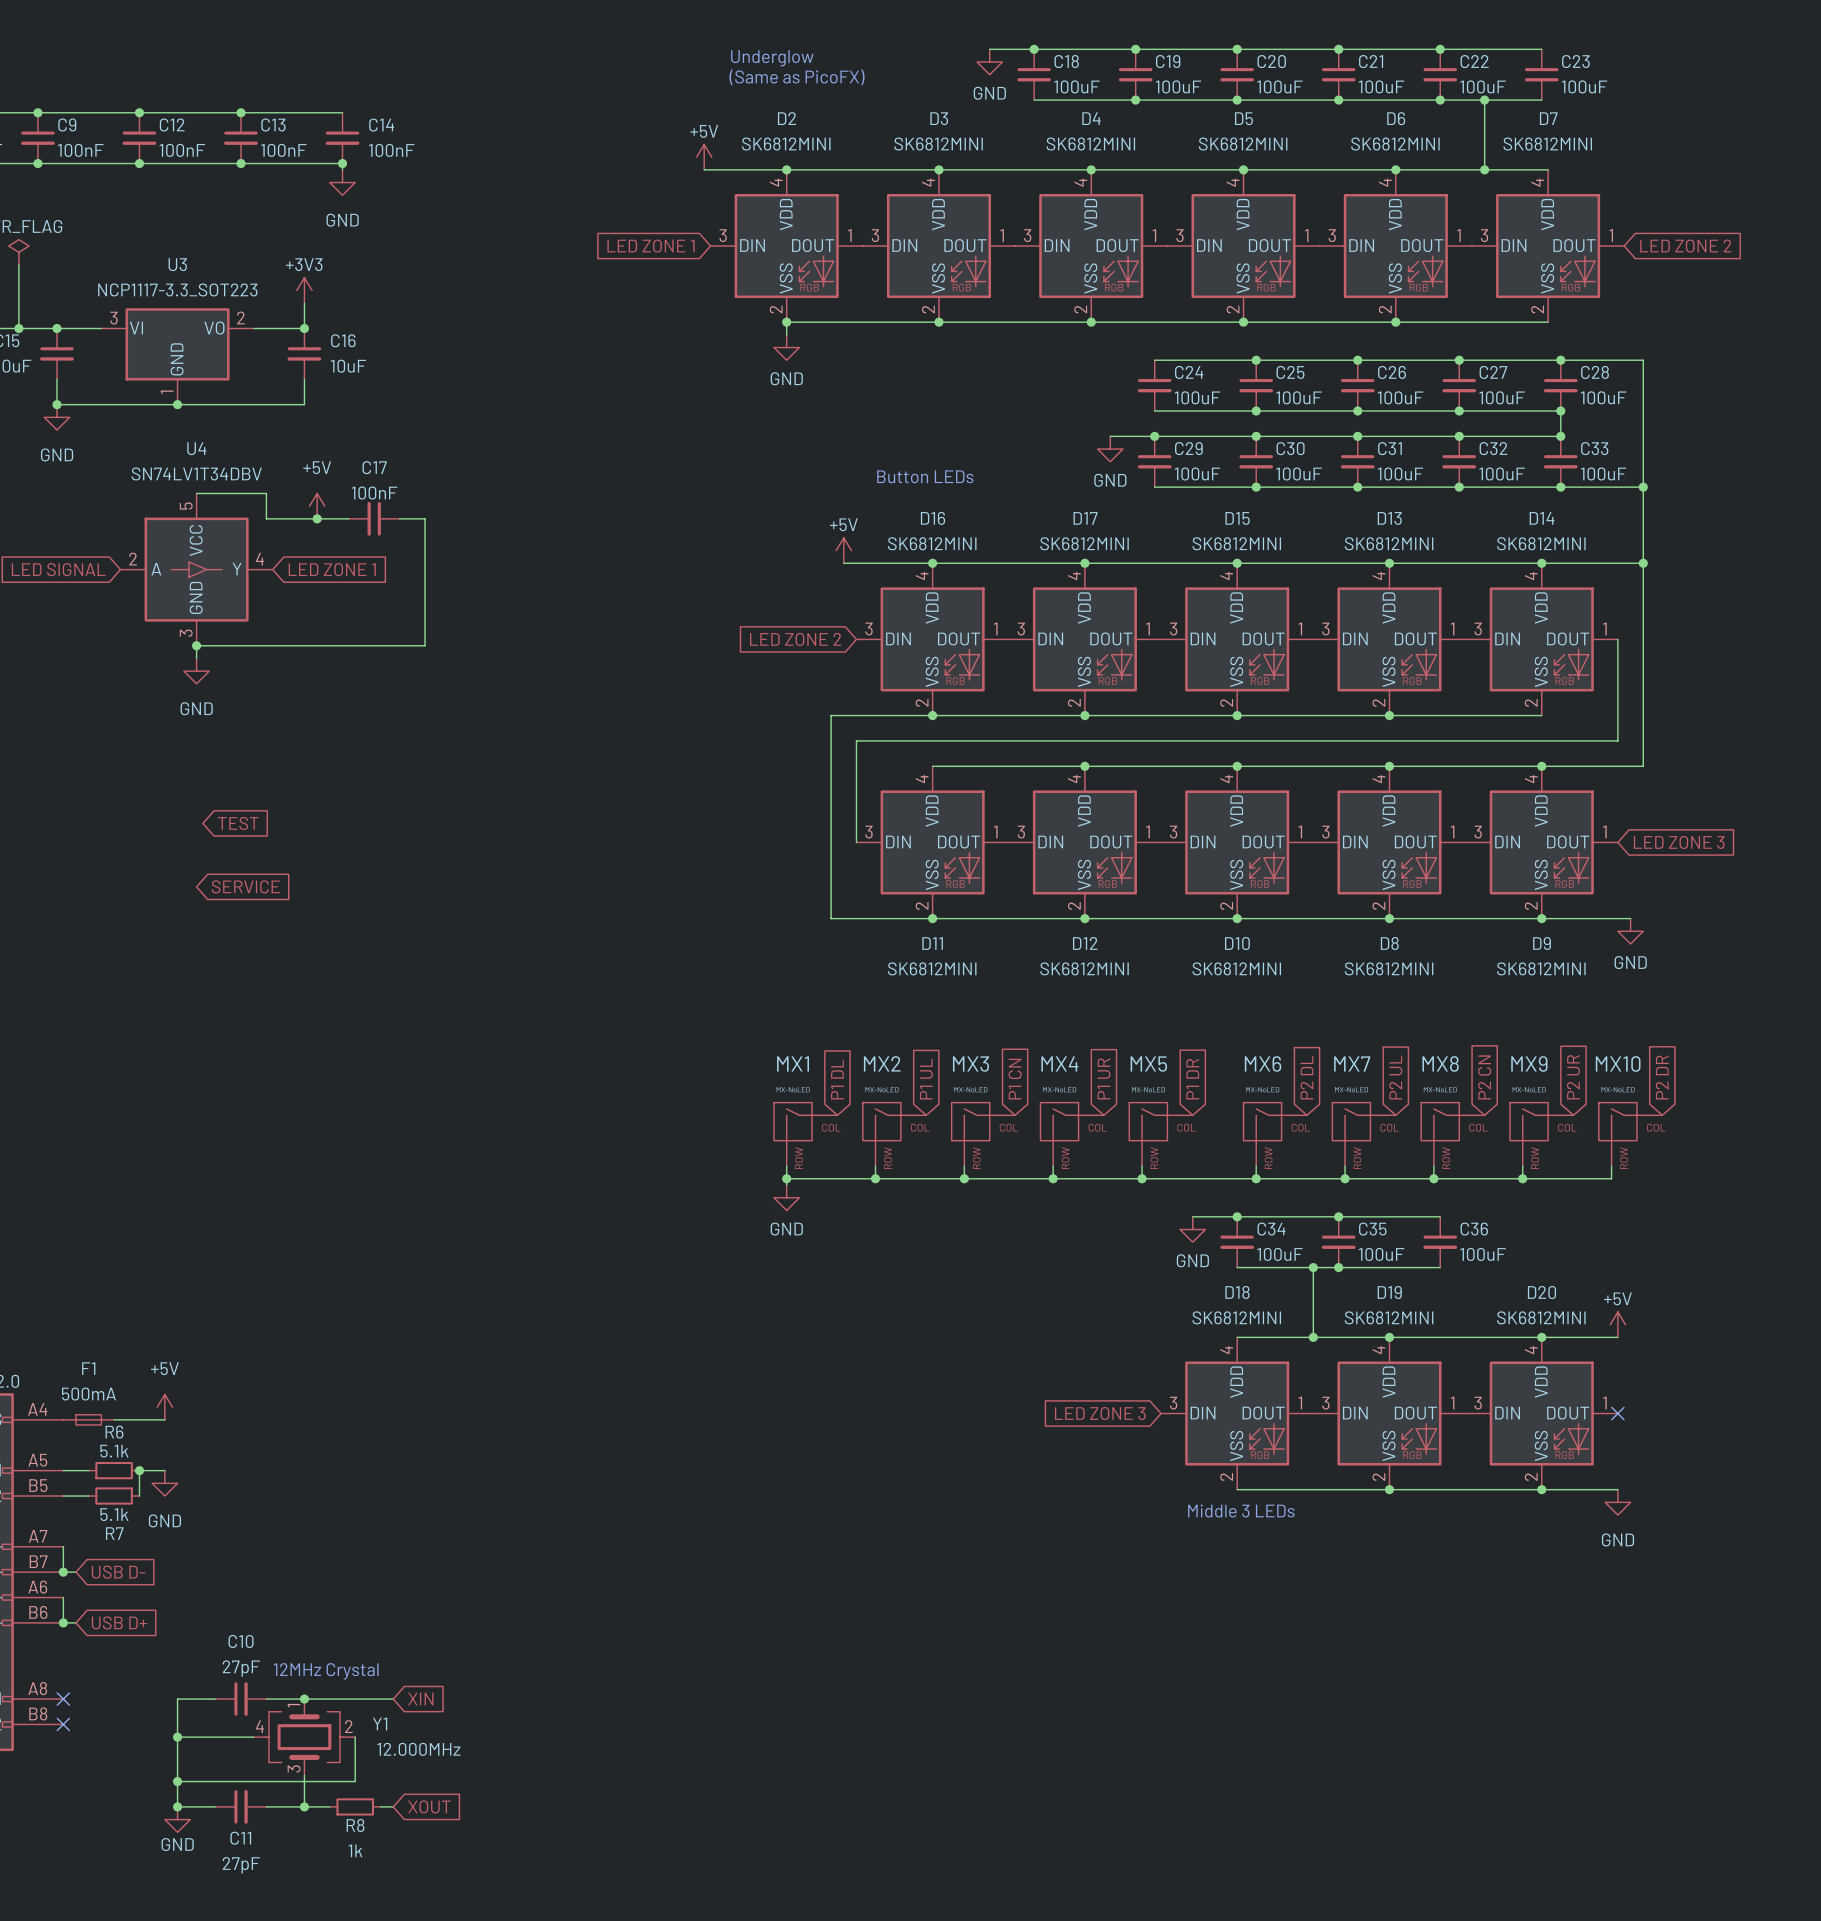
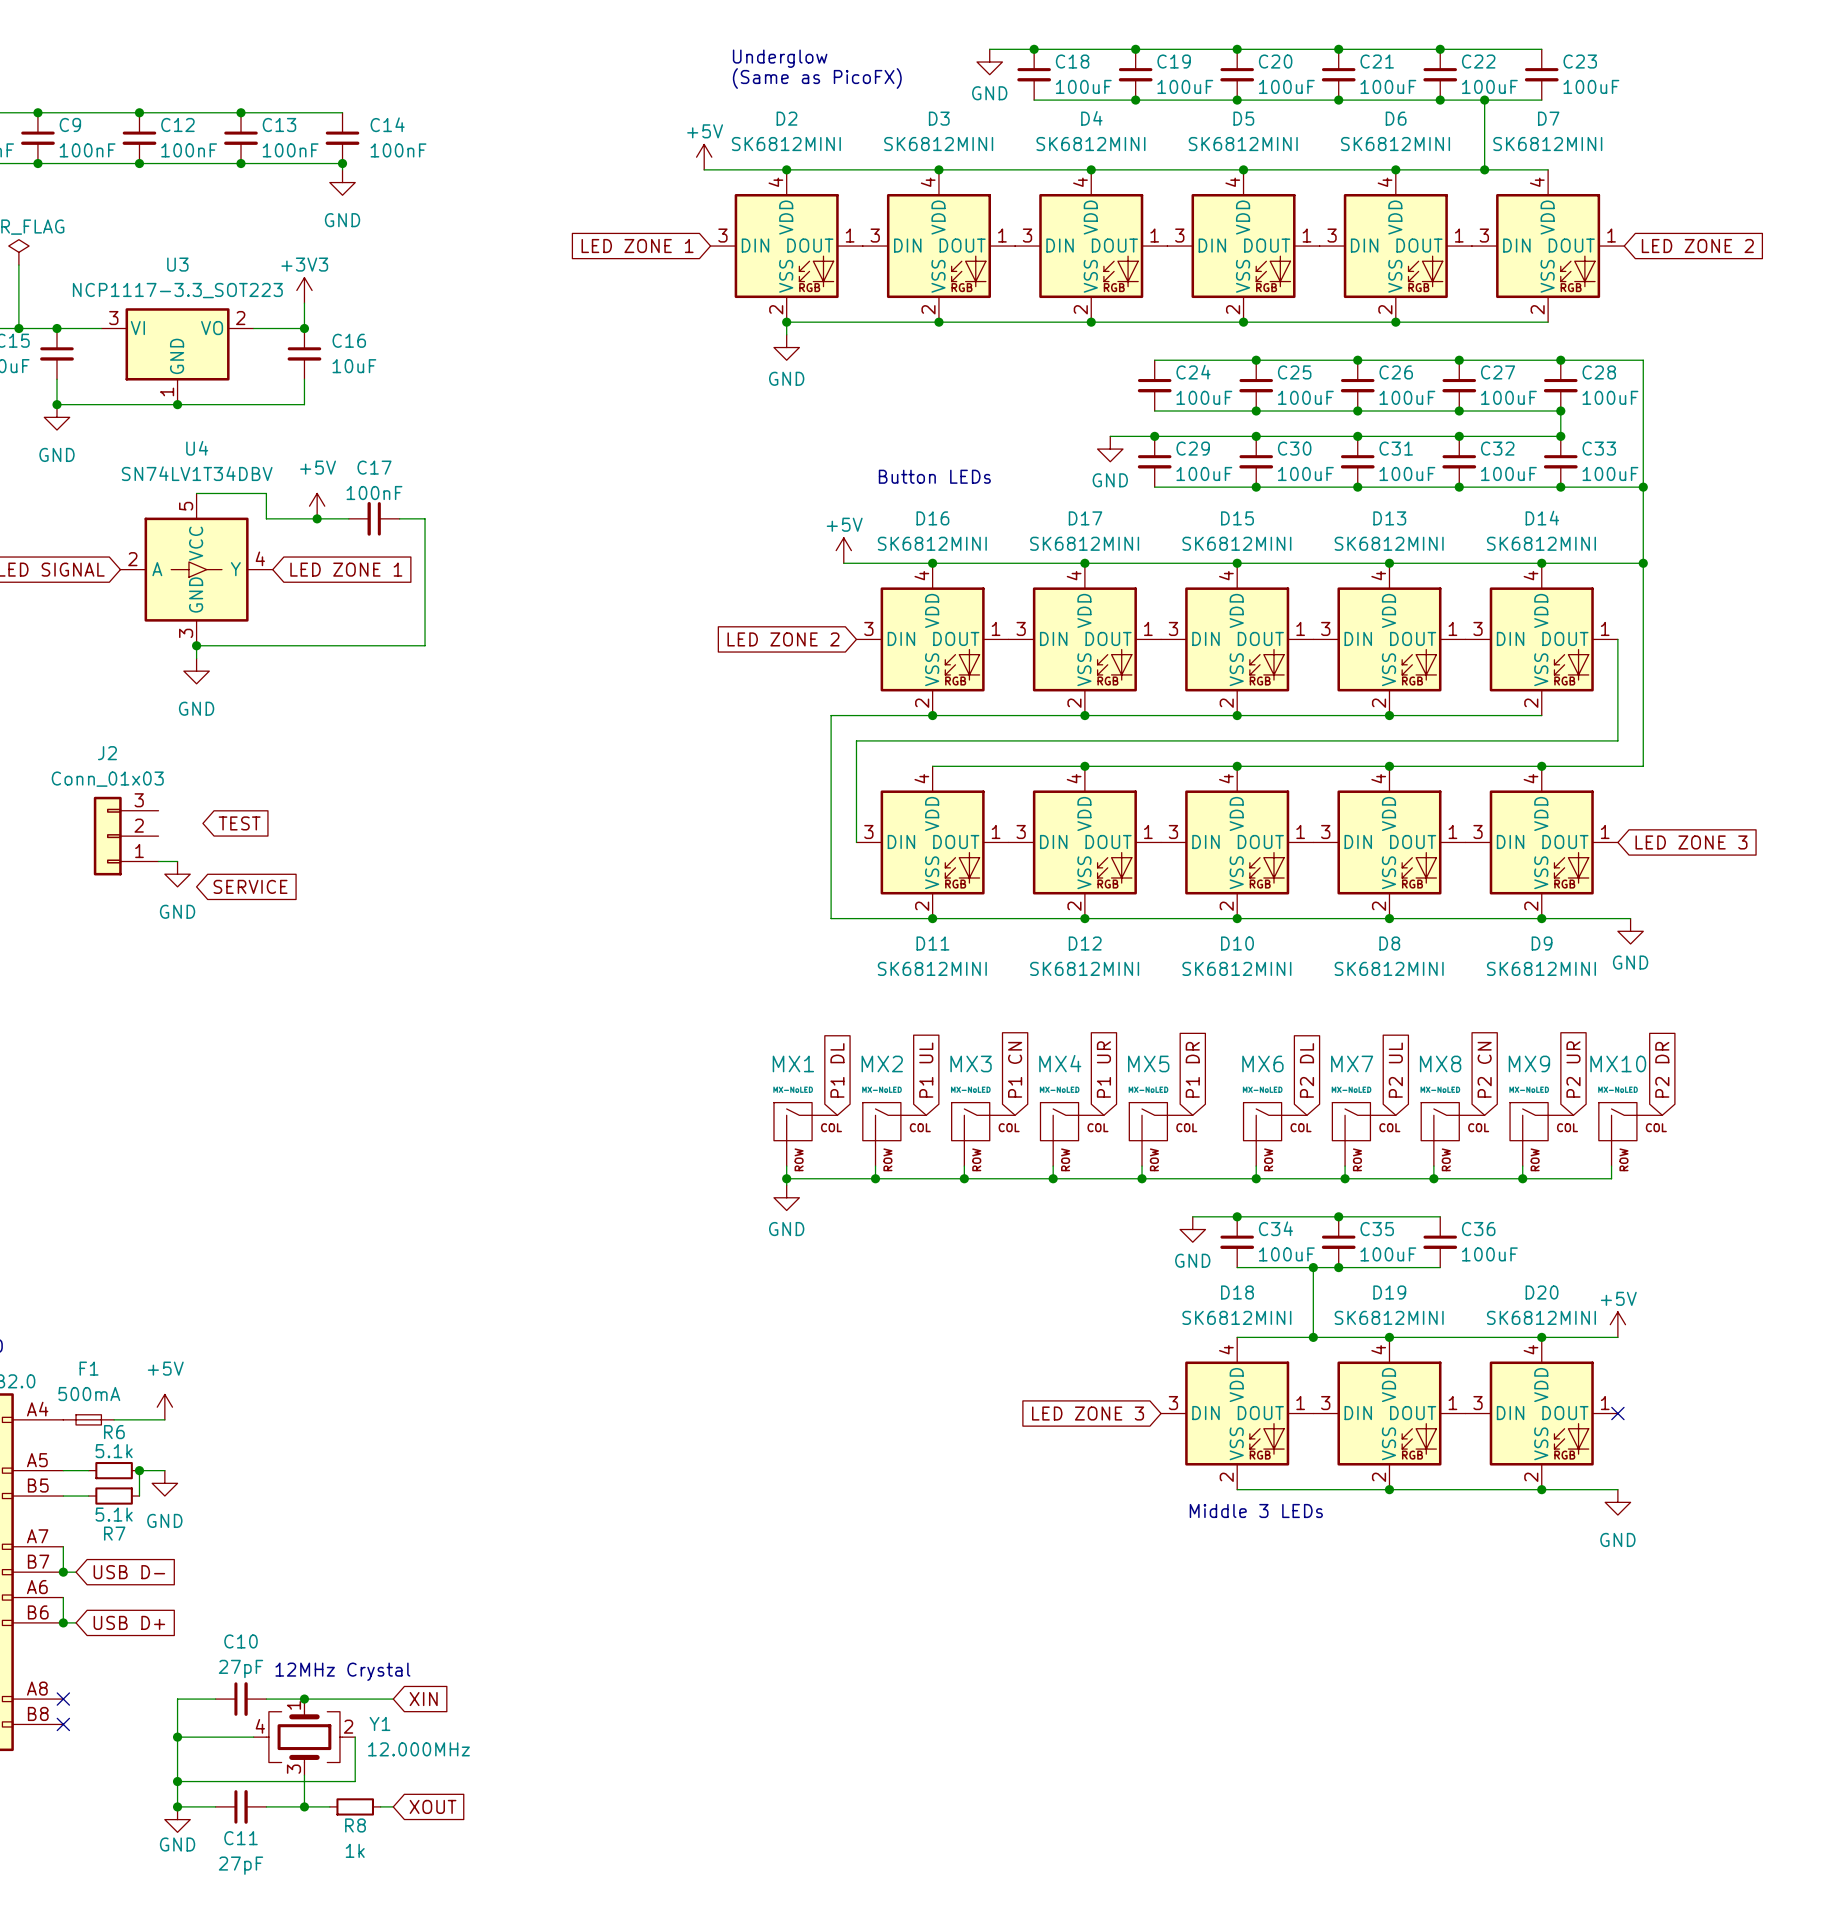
J2: none -> Conn_01x03 (126, 836)
wire: none -> (158, 861) (177, 861)
power symbol: none -> GND (177, 874)

